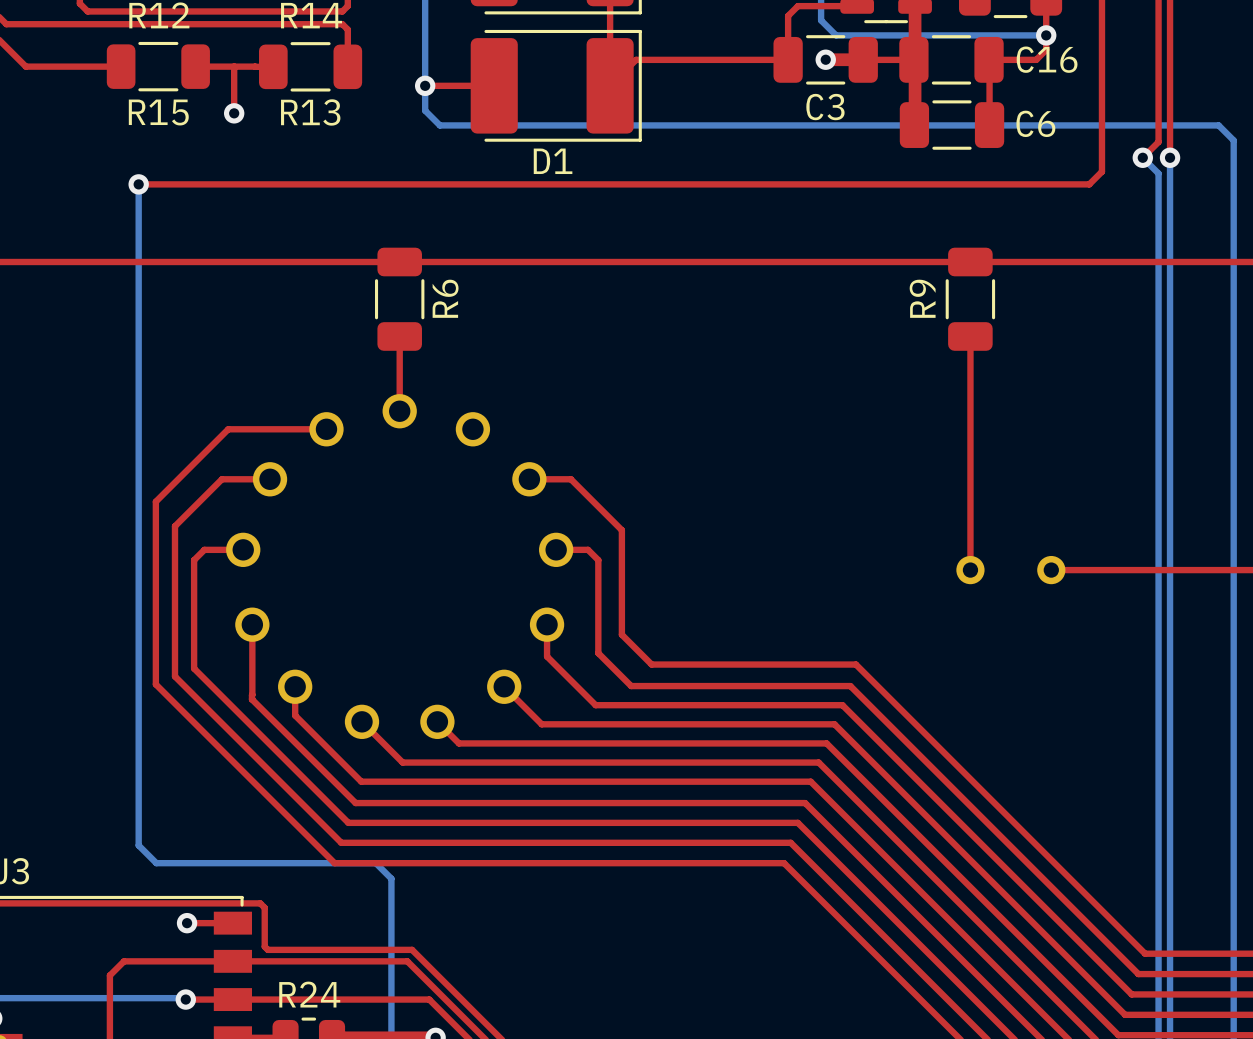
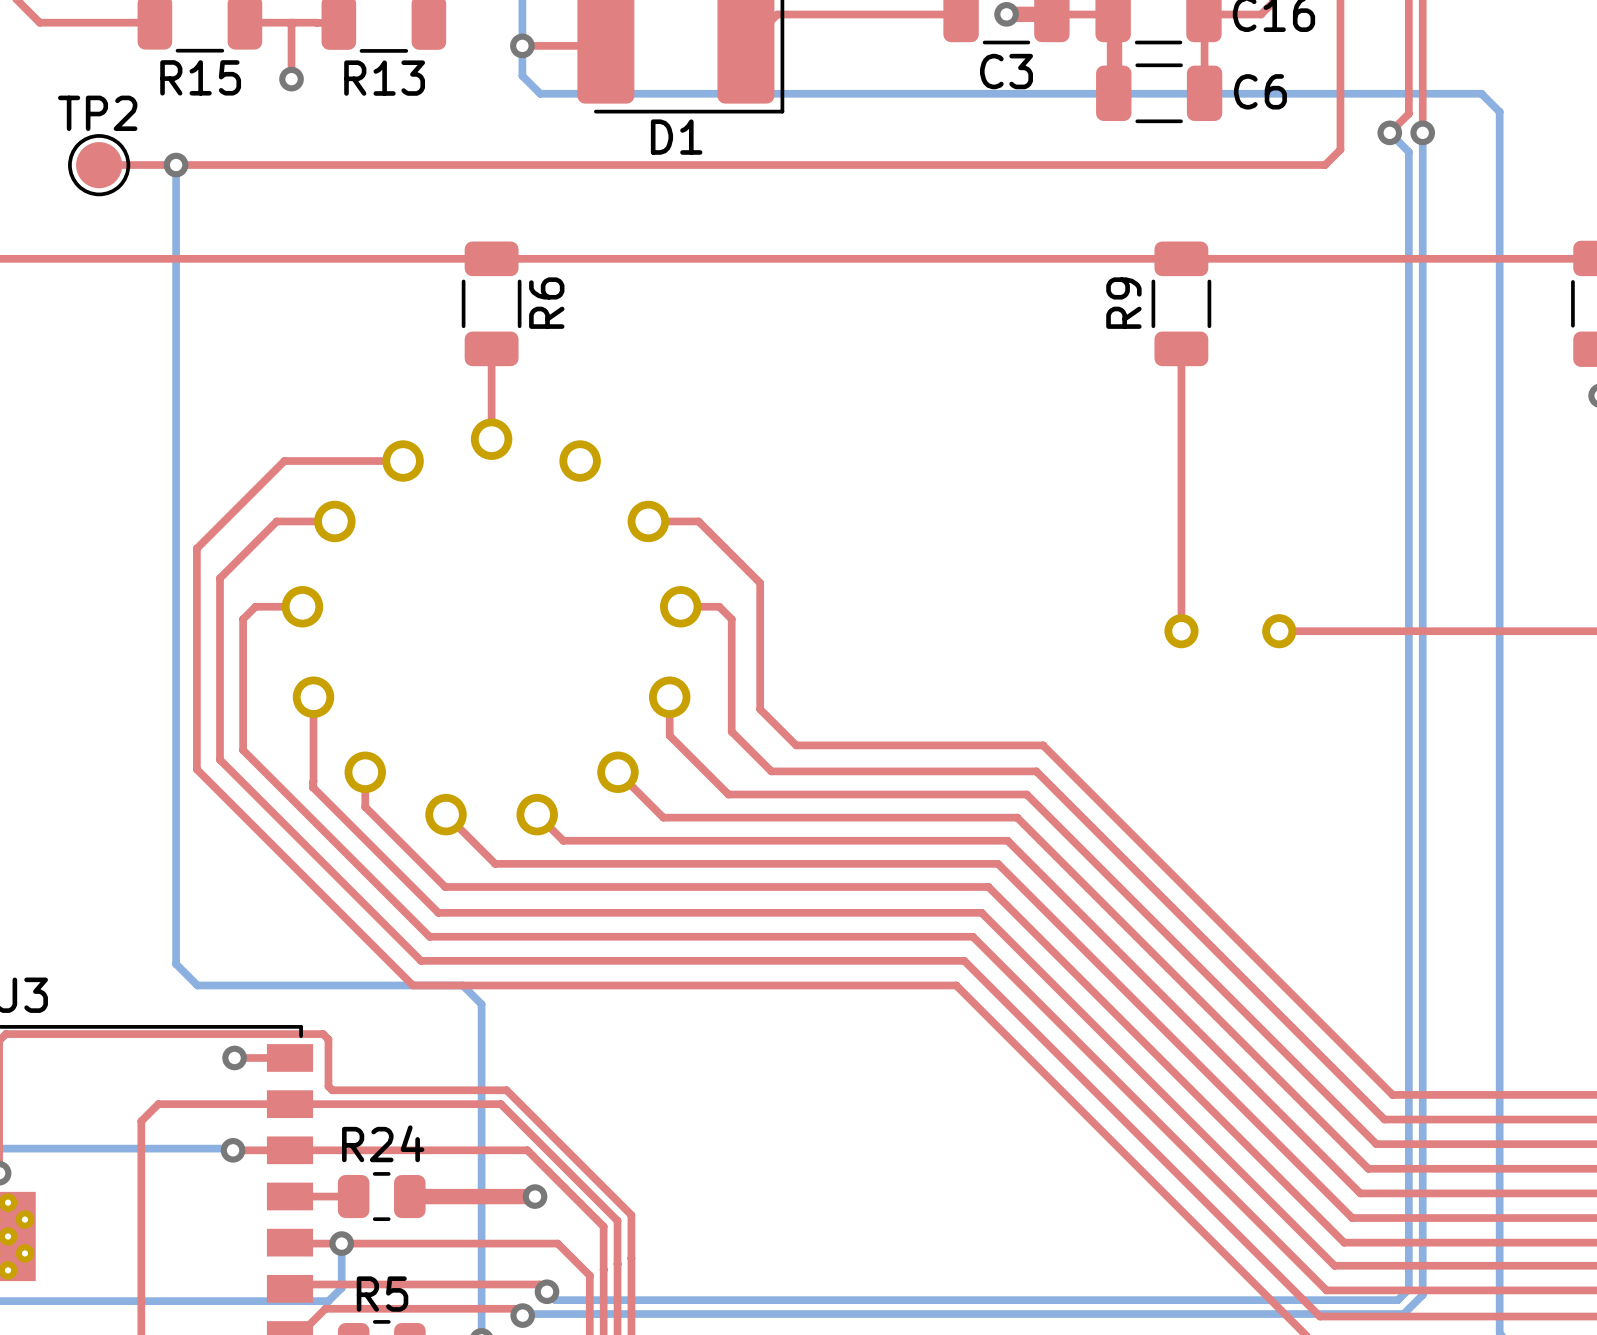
top track: none -> (99, 165) (176, 165)
TP2: none -> (99, 165)

